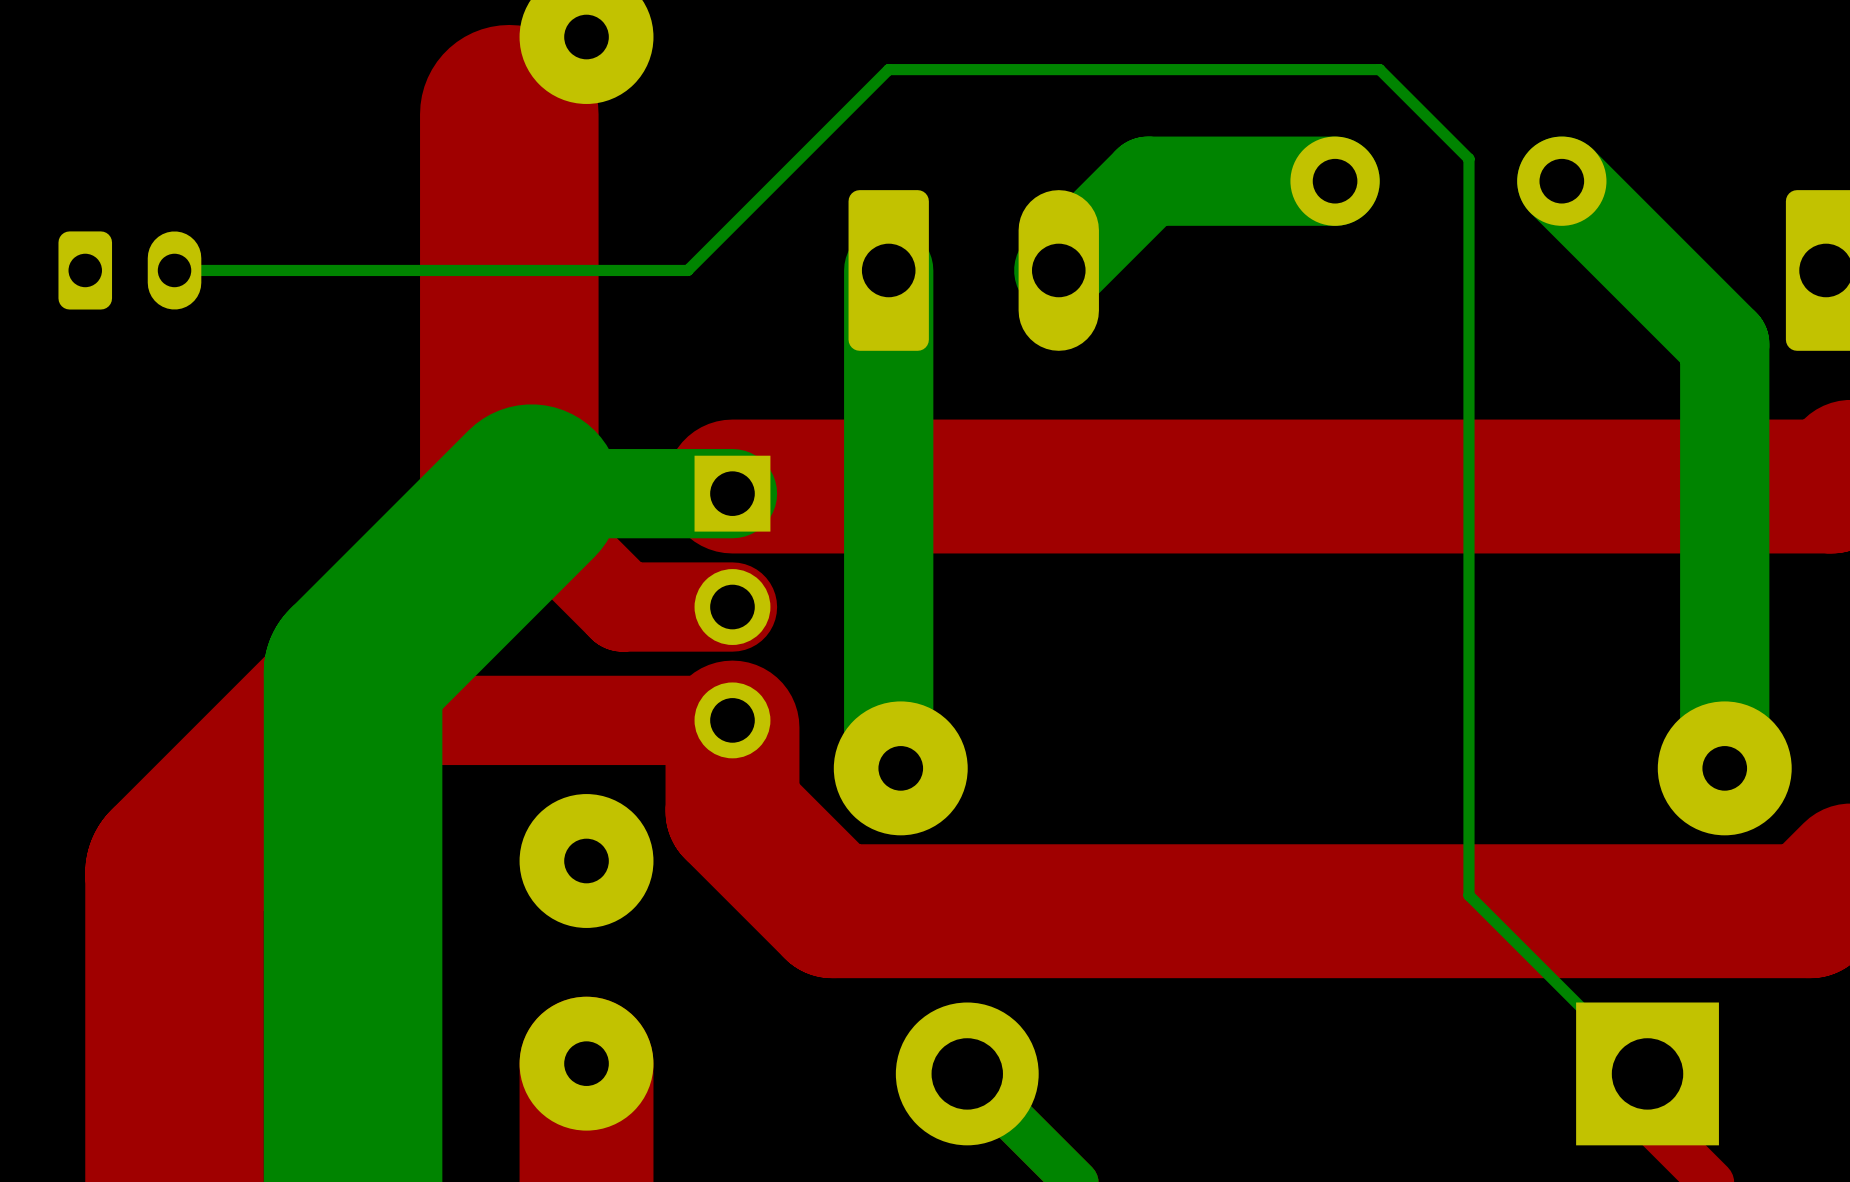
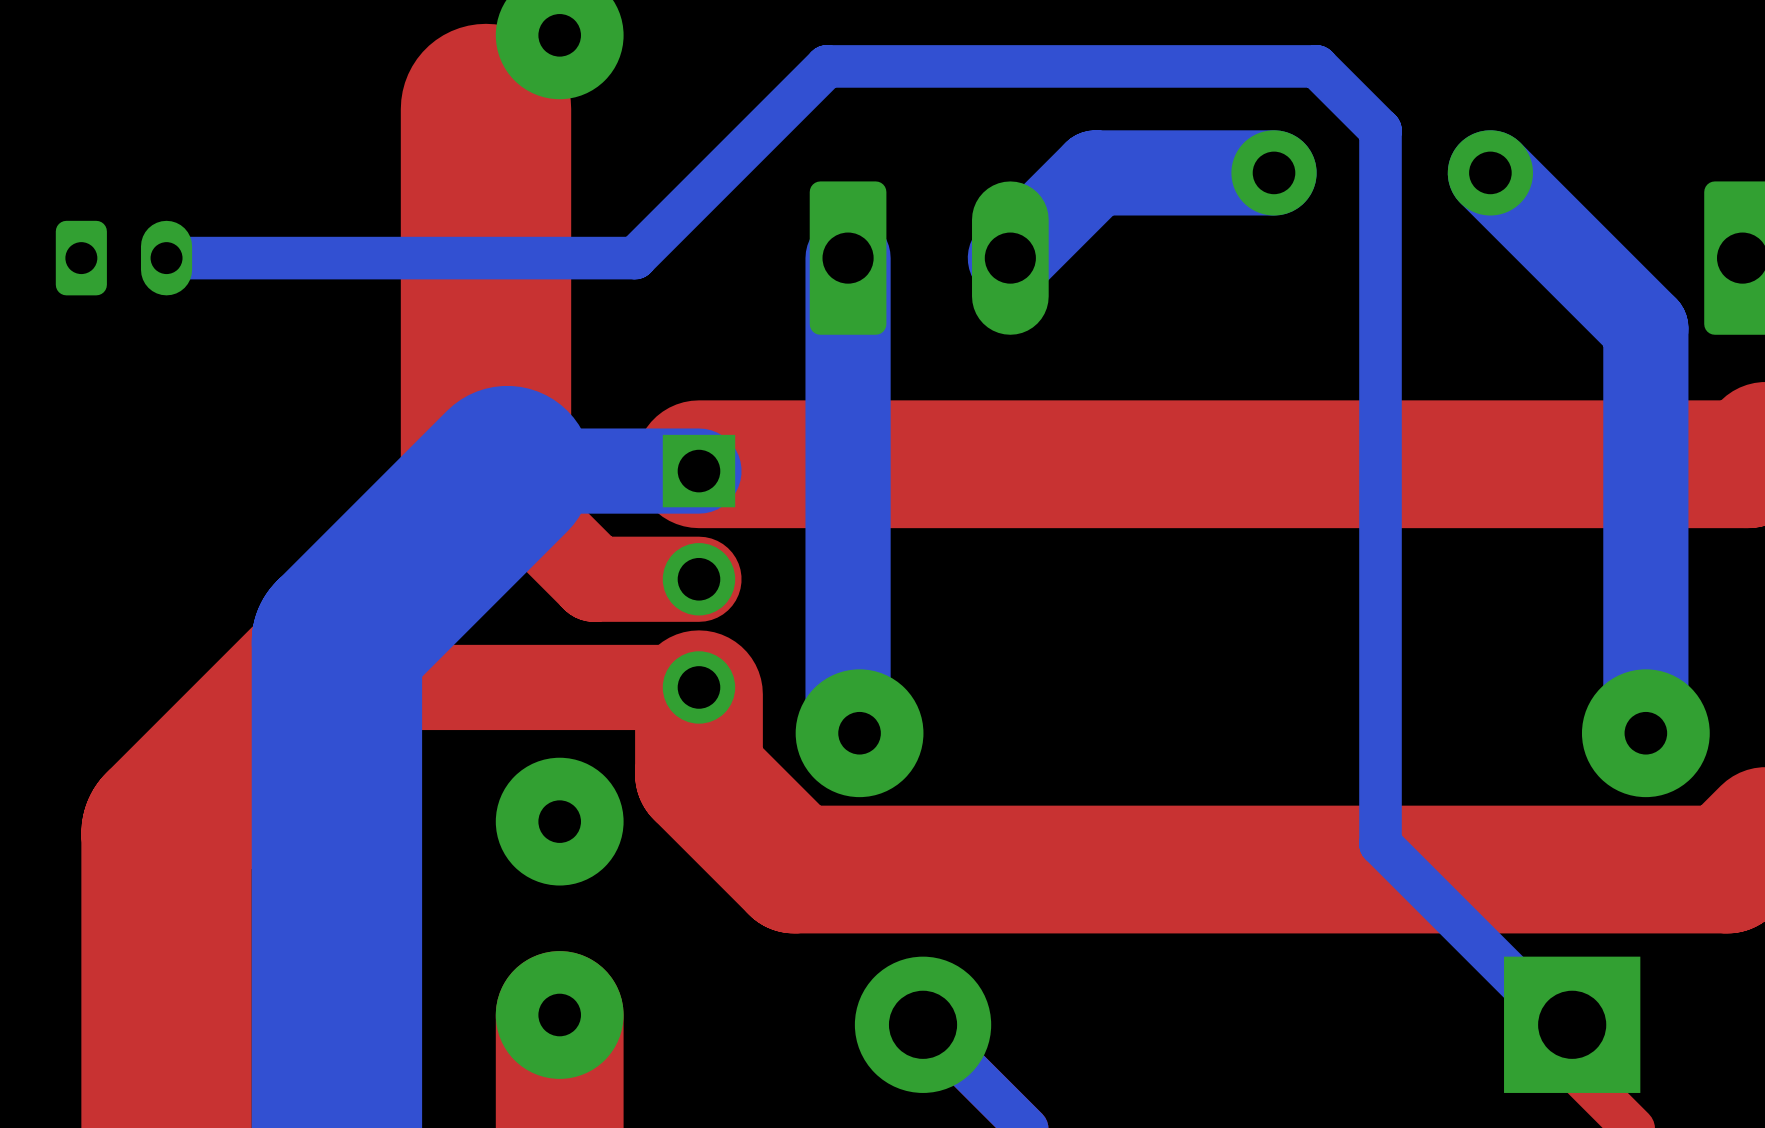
bottom track: (888, 69) (687, 270) (665, 270) -> (848, 66) (826, 66) (635, 258)
bottom track width: thin (888, 69) (1379, 69) (1446, 136) -> thick (848, 66) (1316, 66) (1380, 130)
bottom track: (1446, 136) (1468, 158) (1468, 895) (1647, 1073) -> (1380, 130) (1380, 844) (1561, 1024)
bottom track width: thin (665, 270) (174, 270) -> thick (635, 258) (166, 258)

